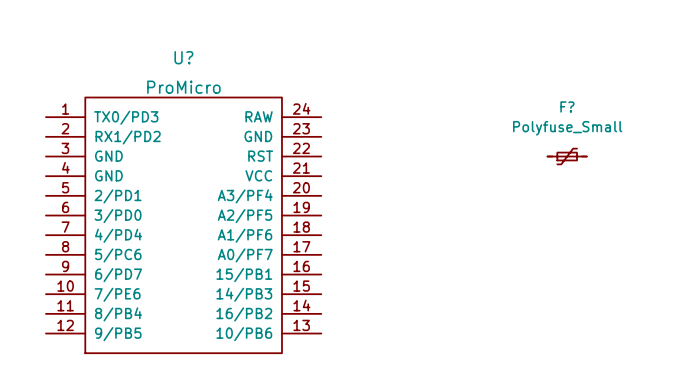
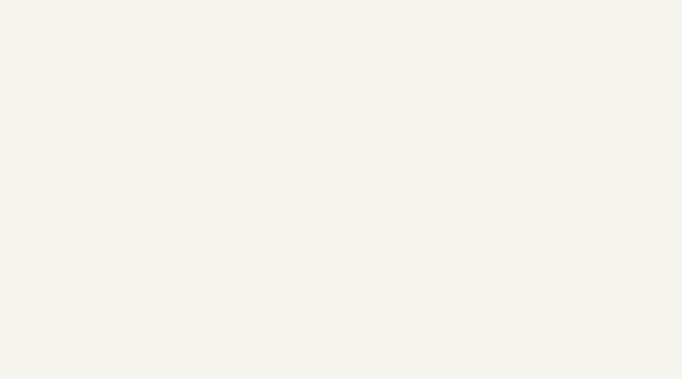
F?: Polyfuse_Small (567, 156) -> none
U?: ProMicro (183, 225) -> none

